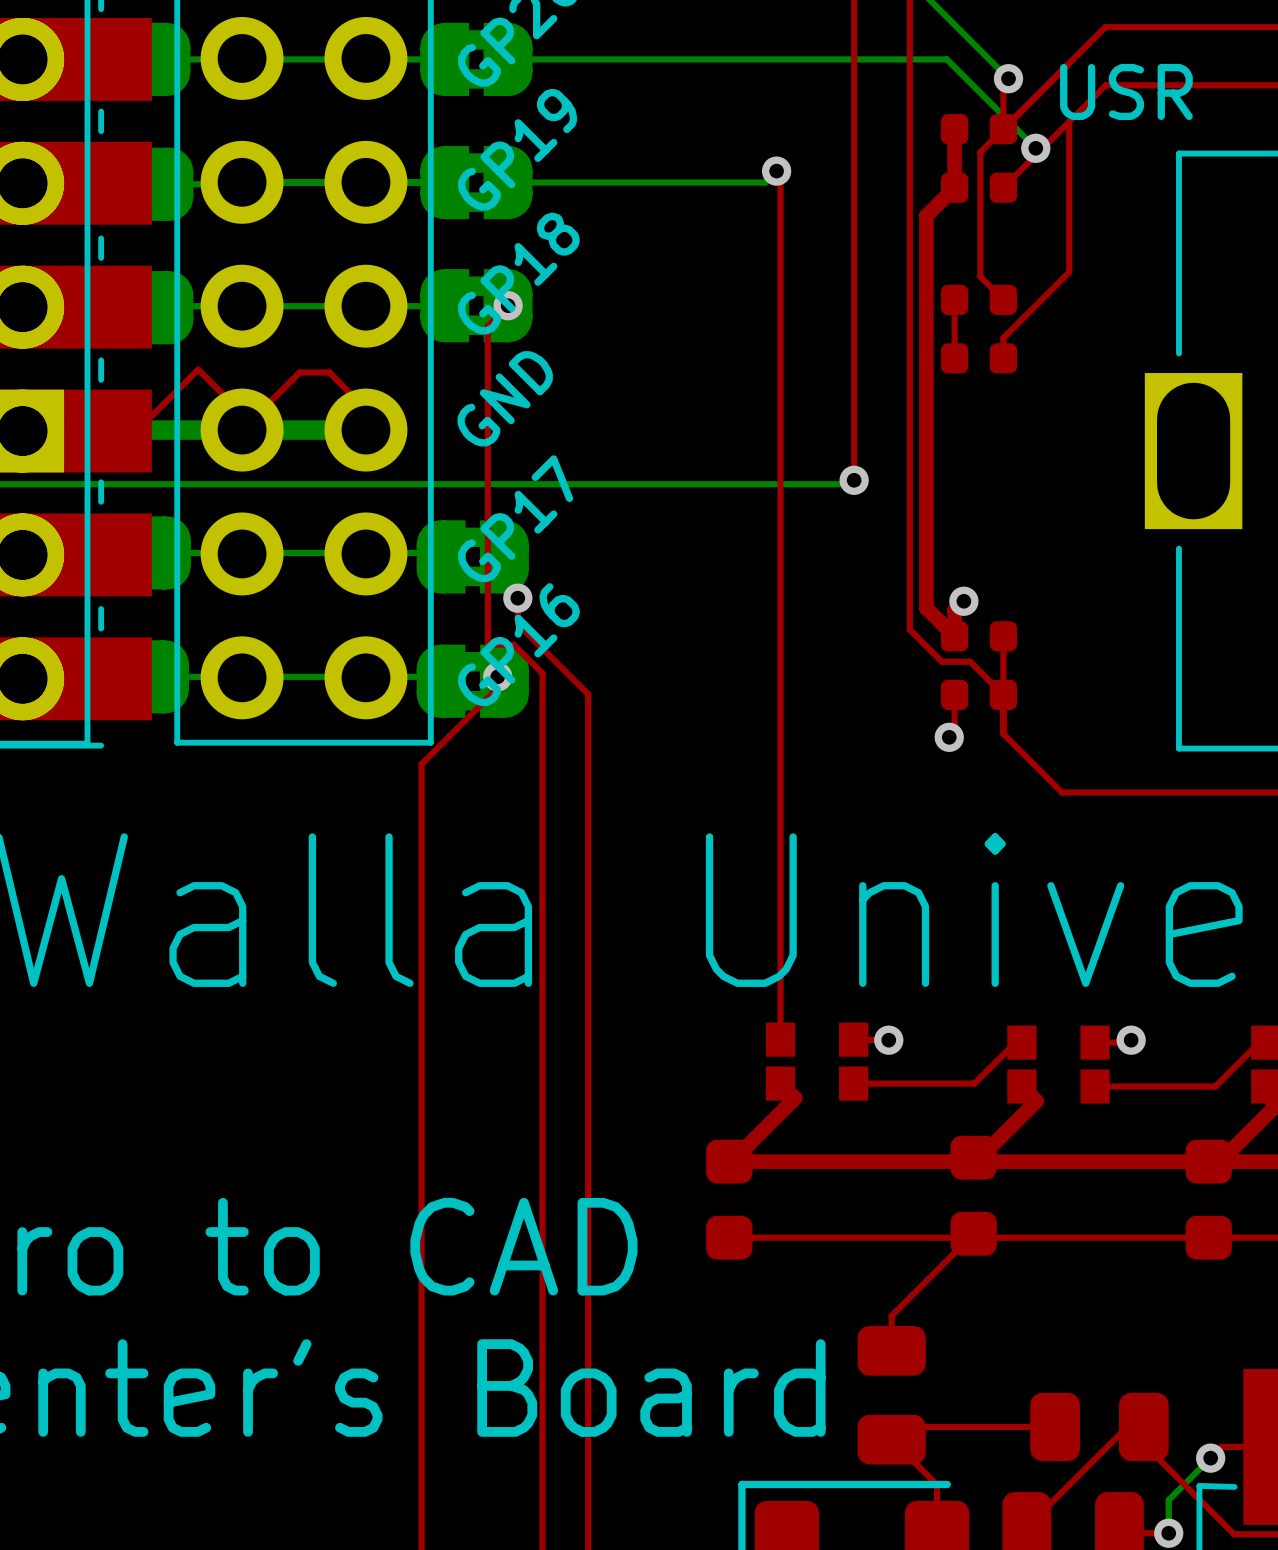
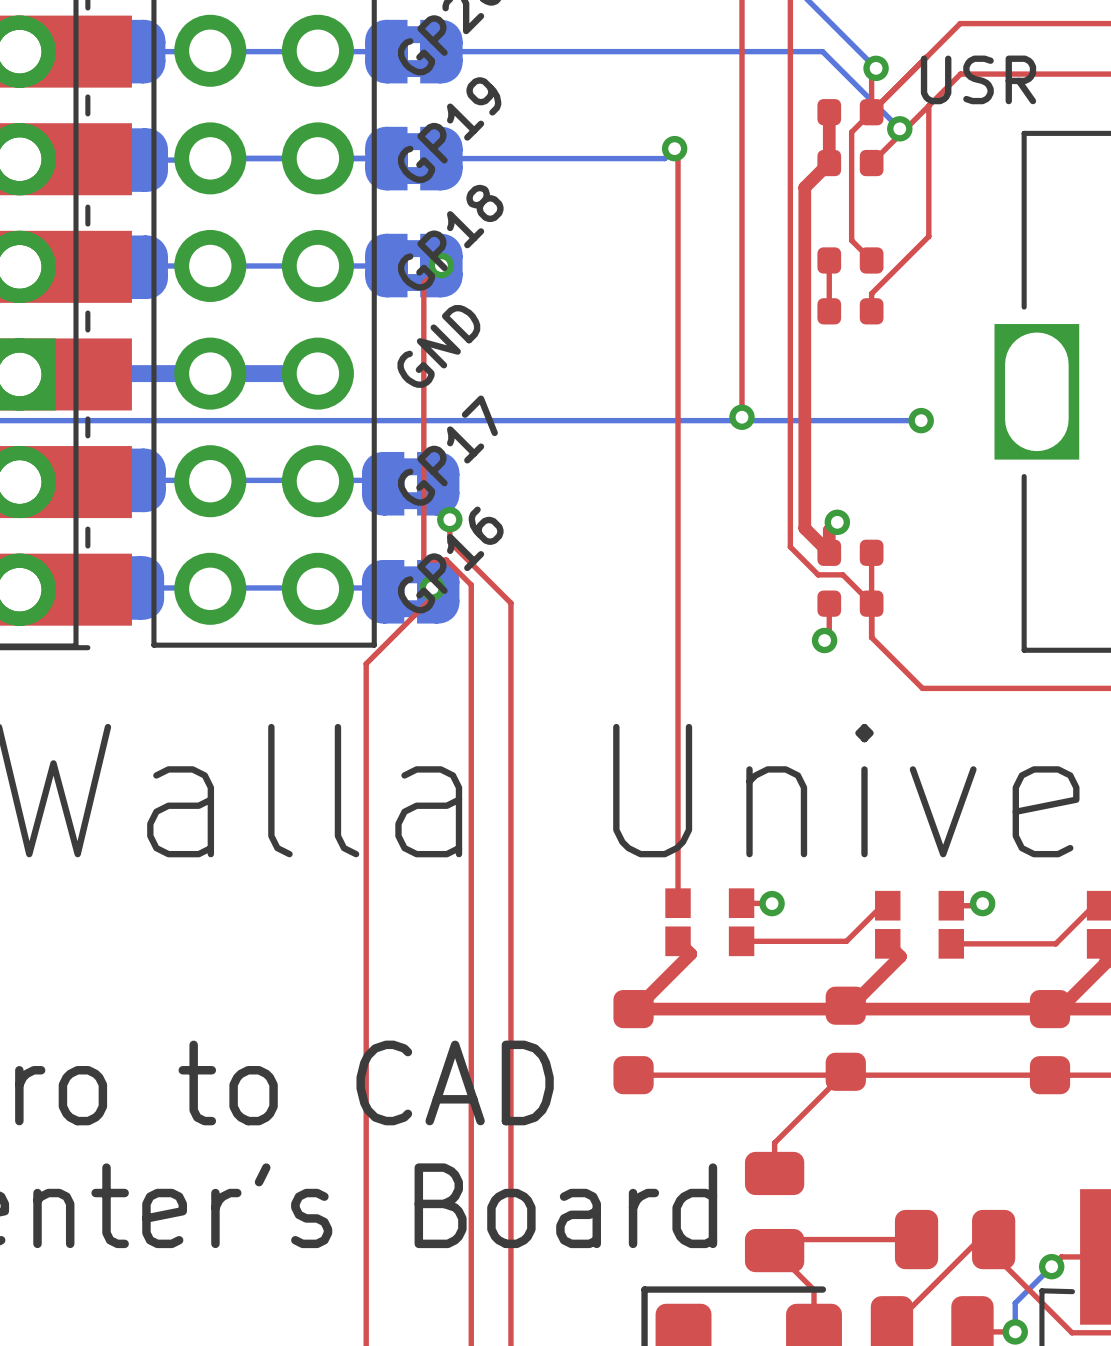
top track: (365, 430) (365, 409) (329, 372) (299, 372) (242, 430) (242, 413) (198, 369) (136, 431) (22, 431) -> none
bottom track: none -> (738, 420) (921, 420)
via: none -> (921, 420)

